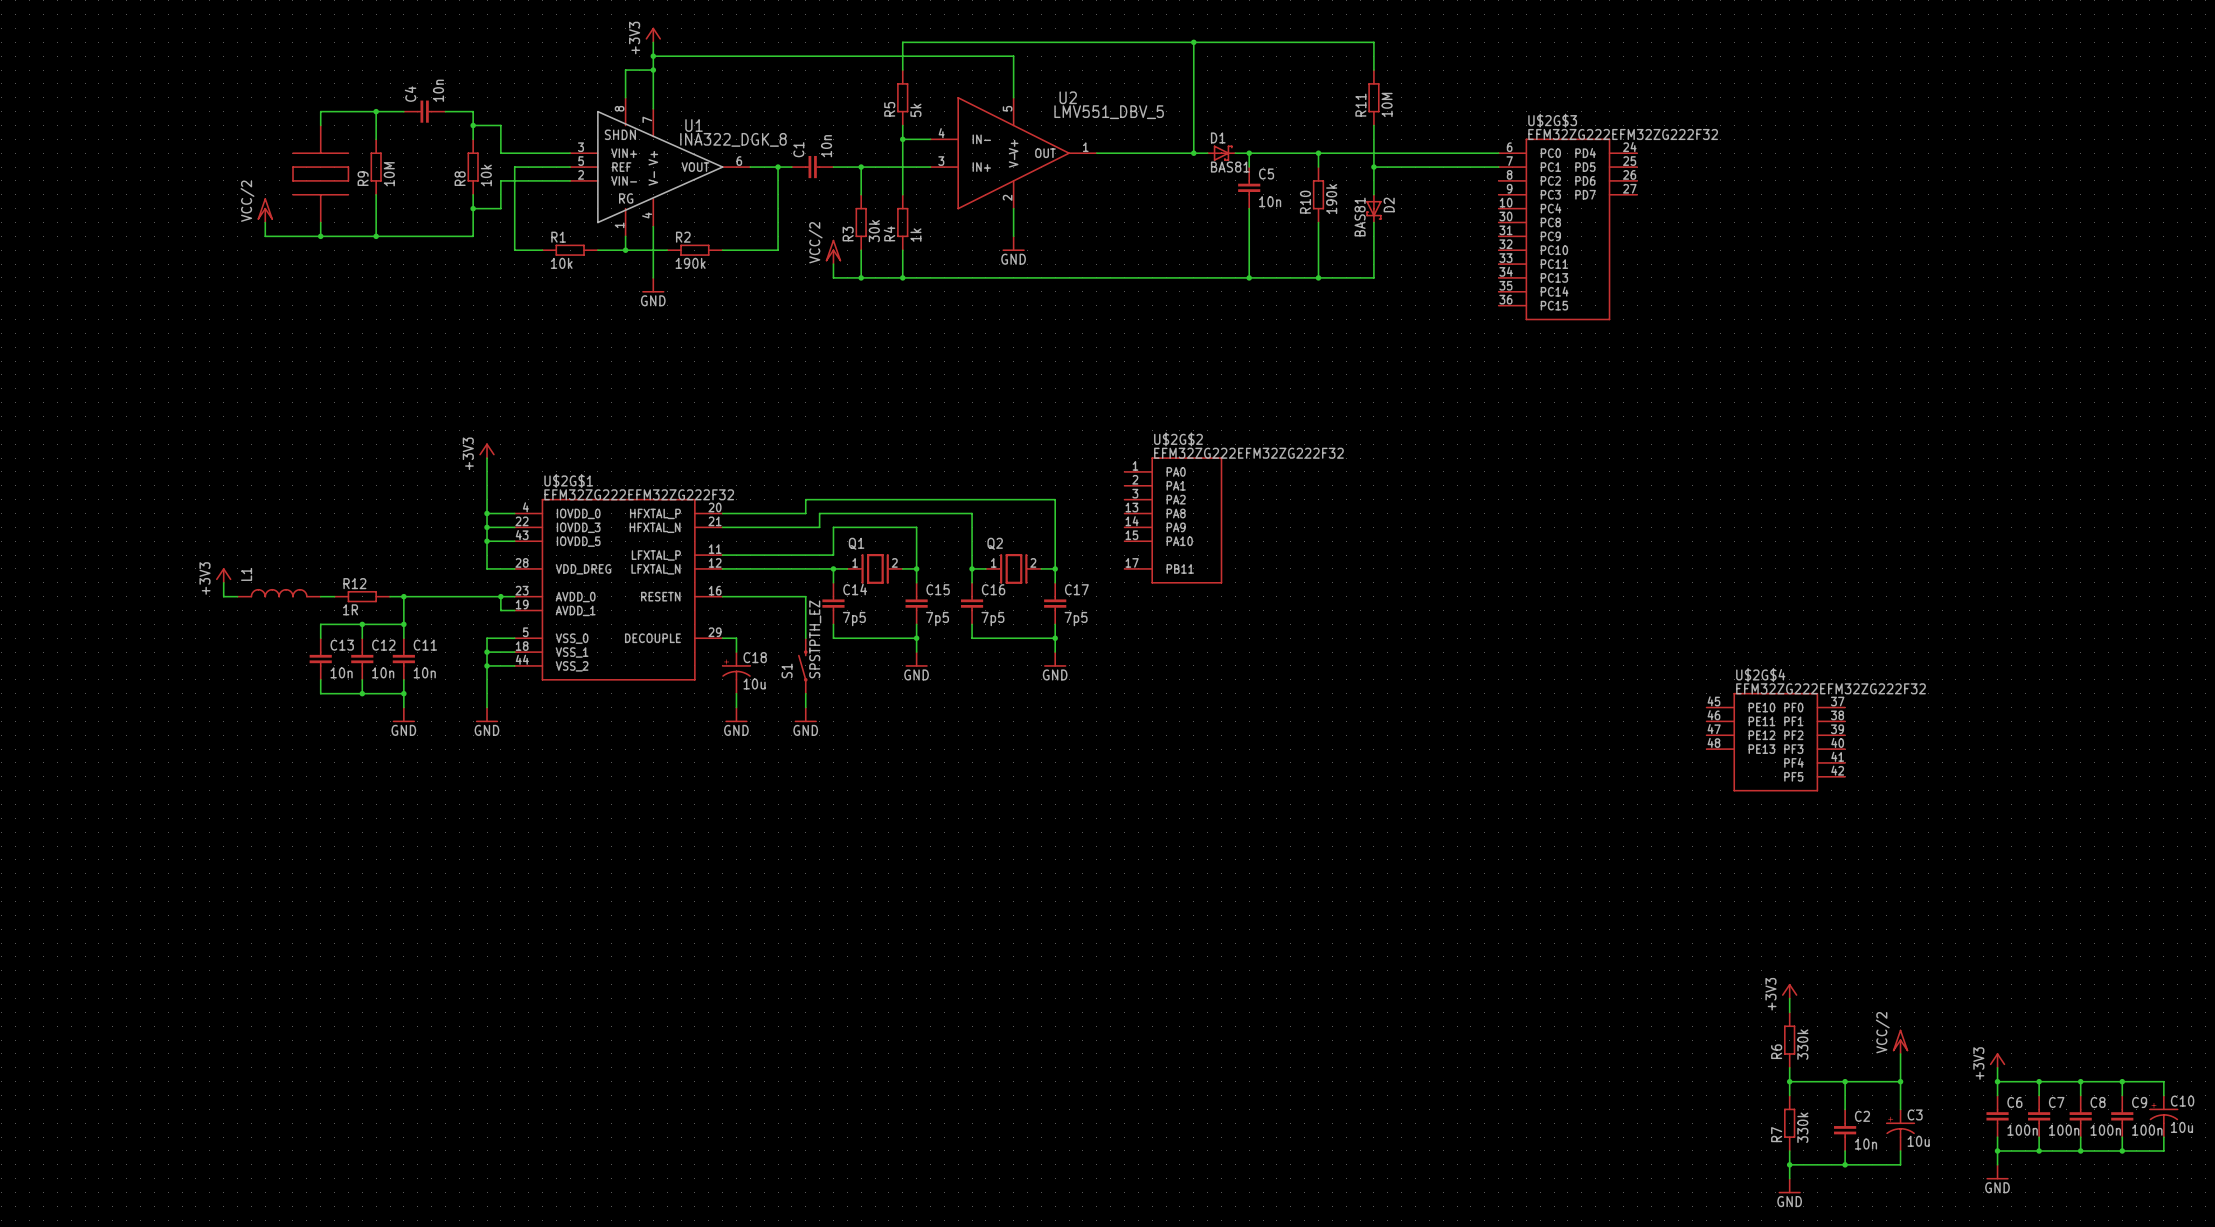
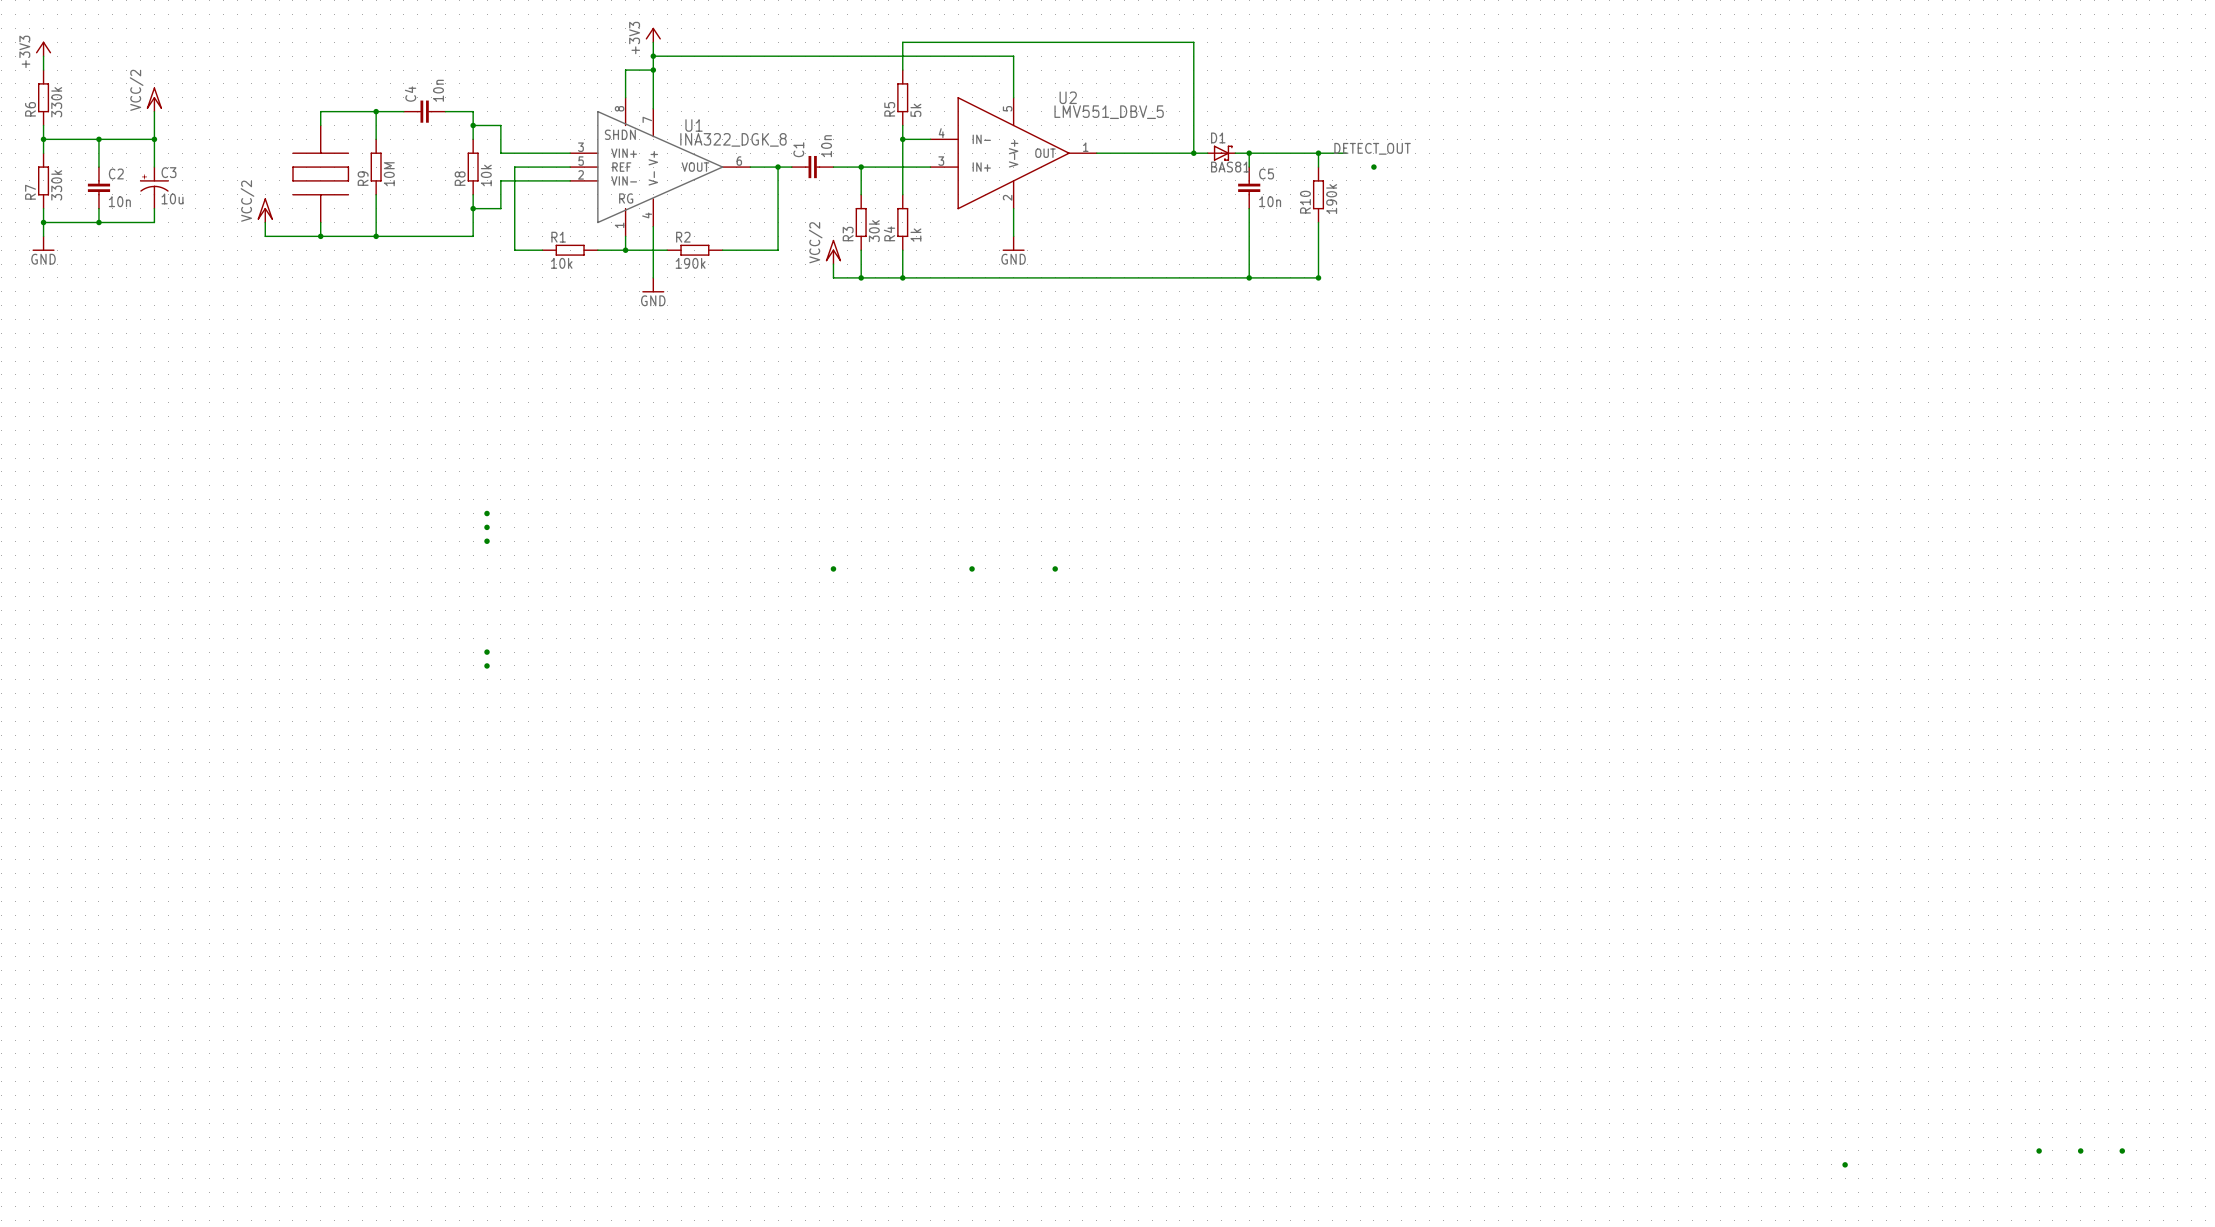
wire: (1193, 42) (1373, 42) (1373, 70) -> none
junction: (1193, 42) -> none
power symbol: none -> +3V3 (43, 48)
wire: none -> (43, 56) (43, 70)
R11: 10M (1373, 97) -> none
power symbol: none -> VCC/2 (154, 99)
wire: none -> (154, 111) (154, 167)
wire: none -> (43, 125) (43, 153)
wire: (1373, 125) (1373, 194) -> none
wire: none -> (43, 139) (154, 139)
junction: none -> (43, 139)
wire: none -> (98, 139) (98, 167)
junction: none -> (98, 139)
junction: none -> (154, 139)
label: none -> DETECT_OUT (1372, 148)
wire: (1346, 153) (1498, 153) -> none
wire: (1373, 167) (1498, 167) -> none
wire: none -> (43, 208) (43, 236)
wire: none -> (98, 208) (98, 222)
wire: none -> (154, 208) (154, 222) (43, 222)
D2: BAS81 (1373, 208) -> none
junction: none -> (43, 222)
junction: none -> (98, 222)
wire: (1373, 222) (1373, 277) (1318, 277) -> none
U$2G$3: EFM32ZG222EFM32ZG222F32 (1567, 229) -> none
power symbol: none -> GND (43, 243)
power symbol: +3V3 (487, 450) -> none
wire: (487, 458) (487, 568) (514, 568) -> none
wire: (487, 513) (514, 513) -> none
wire: (722, 513) (805, 513) (805, 499) (1055, 499) (1055, 582) -> none
U$2G$2: EFM32ZG222EFM32ZG222F32 (1173, 520) -> none
wire: (487, 527) (514, 527) -> none
wire: (722, 527) (819, 527) (819, 513) (972, 513) (972, 582) -> none
wire: (487, 541) (514, 541) -> none
wire: (722, 555) (833, 555) (833, 527) (916, 527) (916, 582) -> none
wire: (722, 568) (847, 568) -> none
wire: (833, 568) (833, 582) -> none
Q1: (875, 568) -> none
wire: (902, 568) (916, 568) -> none
junction: (916, 568) -> none
wire: (972, 568) (985, 568) -> none
Q2: (1013, 568) -> none
wire: (1041, 568) (1055, 568) -> none
power symbol: +3V3 (223, 575) -> none
wire: (223, 582) (223, 596) (237, 596) -> none
U$2G$1: EFM32ZG222EFM32ZG222F32 (618, 589) -> none
L1: (279, 593) -> none
wire: (320, 596) (334, 596) -> none
R12: 1R (362, 596) -> none
wire: (390, 596) (514, 596) -> none
wire: (403, 596) (403, 638) -> none
junction: (403, 596) -> none
wire: (500, 596) (500, 610) (514, 610) -> none
junction: (500, 596) -> none
wire: (722, 596) (805, 596) (805, 638) -> none
C14: 7p5 (833, 603) -> none
C15: 7p5 (916, 603) -> none
C16: 7p5 (972, 603) -> none
C17: 7p5 (1055, 603) -> none
wire: (362, 624) (362, 638) -> none
junction: (362, 624) -> none
wire: (403, 624) (320, 624) (320, 638) -> none
junction: (403, 624) -> none
wire: (833, 624) (833, 638) (916, 638) -> none
wire: (916, 624) (916, 652) -> none
wire: (972, 624) (972, 638) (1055, 638) -> none
wire: (1055, 624) (1055, 652) -> none
wire: (514, 638) (487, 638) (487, 707) -> none
wire: (722, 638) (736, 638) (736, 652) -> none
junction: (916, 638) -> none
junction: (1055, 638) -> none
wire: (487, 652) (514, 652) -> none
C13: 10n (320, 659) -> none
C12: 10n (362, 659) -> none
C11: 10n (403, 659) -> none
power symbol: GND (916, 659) -> none
power symbol: GND (1055, 659) -> none
wire: (487, 665) (514, 665) -> none
S1: SPSTPTH_EZ (802, 665) -> none
C18: 10u (736, 672) -> none
wire: (320, 679) (320, 693) (403, 693) -> none
wire: (362, 679) (362, 693) -> none
wire: (403, 679) (403, 707) -> none
junction: (362, 693) -> none
junction: (403, 693) -> none
wire: (736, 693) (736, 707) -> none
wire: (805, 693) (805, 707) -> none
power symbol: GND (403, 714) -> none
power symbol: GND (487, 714) -> none
power symbol: GND (736, 714) -> none
power symbol: GND (805, 714) -> none
U$2G$4: EFM32ZG222EFM32ZG222F32 (1775, 742) -> none
power symbol: +3V3 (1789, 991) -> none
wire: (1789, 998) (1789, 1012) -> none
R6 position: (1789, 1040) -> (43, 97)
power symbol: VCC/2 (1900, 1041) -> none
wire: (1900, 1053) (1900, 1109) -> none
power symbol: +3V3 (1997, 1060) -> none
wire: (1789, 1067) (1789, 1095) -> none
wire: (1997, 1067) (1997, 1095) -> none
wire: (1789, 1081) (1900, 1081) -> none
junction: (1789, 1081) -> none
wire: (1845, 1081) (1845, 1109) -> none
junction: (1845, 1081) -> none
junction: (1900, 1081) -> none
wire: (1997, 1081) (2163, 1081) (2163, 1095) -> none
junction: (1997, 1081) -> none
wire: (2039, 1081) (2039, 1095) -> none
junction: (2039, 1081) -> none
wire: (2080, 1081) (2080, 1095) -> none
junction: (2080, 1081) -> none
wire: (2122, 1081) (2122, 1095) -> none
junction: (2122, 1081) -> none
C6: 100n (1997, 1116) -> none
C7: 100n (2039, 1116) -> none
C8: 100n (2080, 1116) -> none
C9: 100n (2122, 1116) -> none
C10: 10u (2163, 1116) -> none
R7 position: (1789, 1123) -> (43, 180)
C2 position: (1845, 1130) -> (98, 187)
C3 position: (1900, 1130) -> (154, 187)
wire: (1997, 1137) (1997, 1164) -> none
wire: (2039, 1137) (2039, 1150) -> none
wire: (2080, 1137) (2080, 1150) -> none
wire: (2122, 1137) (2122, 1150) -> none
wire: (2163, 1137) (2163, 1150) (1997, 1150) -> none
wire: (1789, 1150) (1789, 1178) -> none
wire: (1845, 1150) (1845, 1164) -> none
wire: (1900, 1150) (1900, 1164) (1789, 1164) -> none
junction: (1997, 1150) -> none
junction: (1789, 1164) -> none
power symbol: GND (1997, 1172) -> none
power symbol: GND (1789, 1185) -> none

